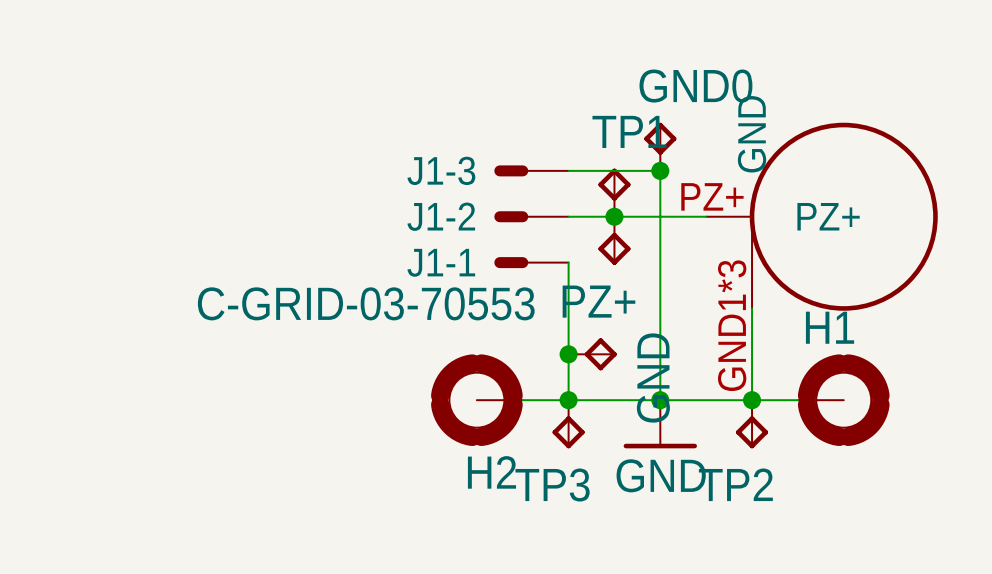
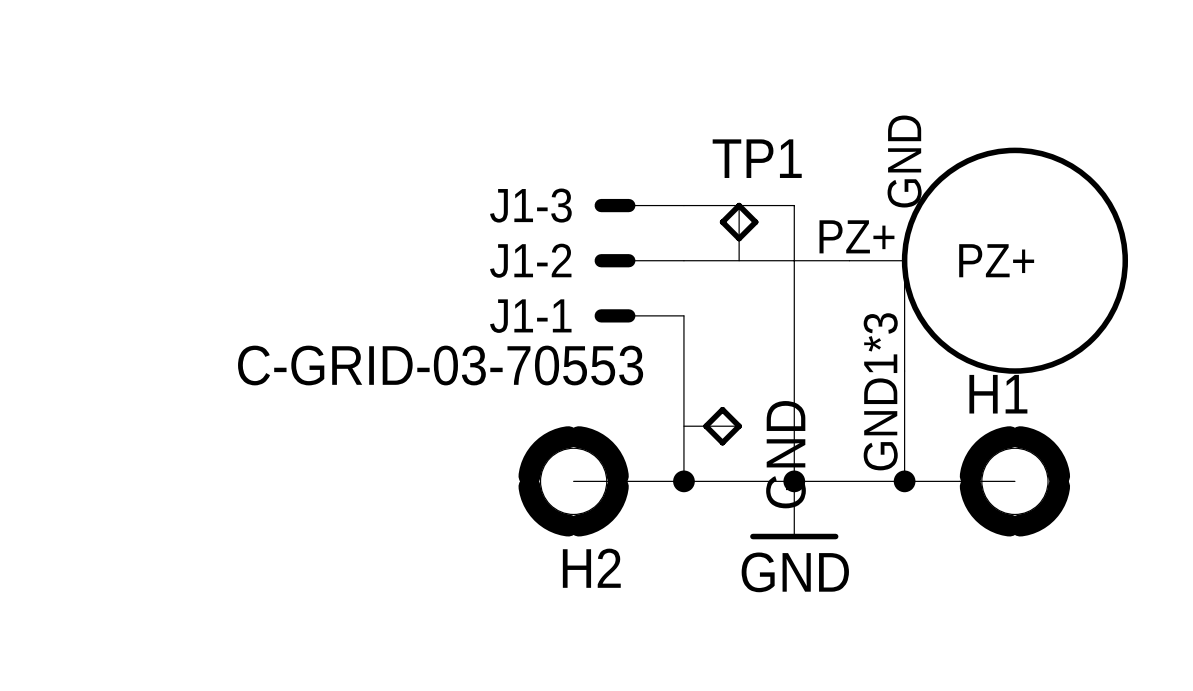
GND0: (660, 146) -> none
junction: (660, 170) -> none
junction: (614, 216) -> none
PZ+: (614, 240) -> none
junction: (568, 354) -> none
TP3: (568, 424) -> none
TP2: (752, 424) -> none

